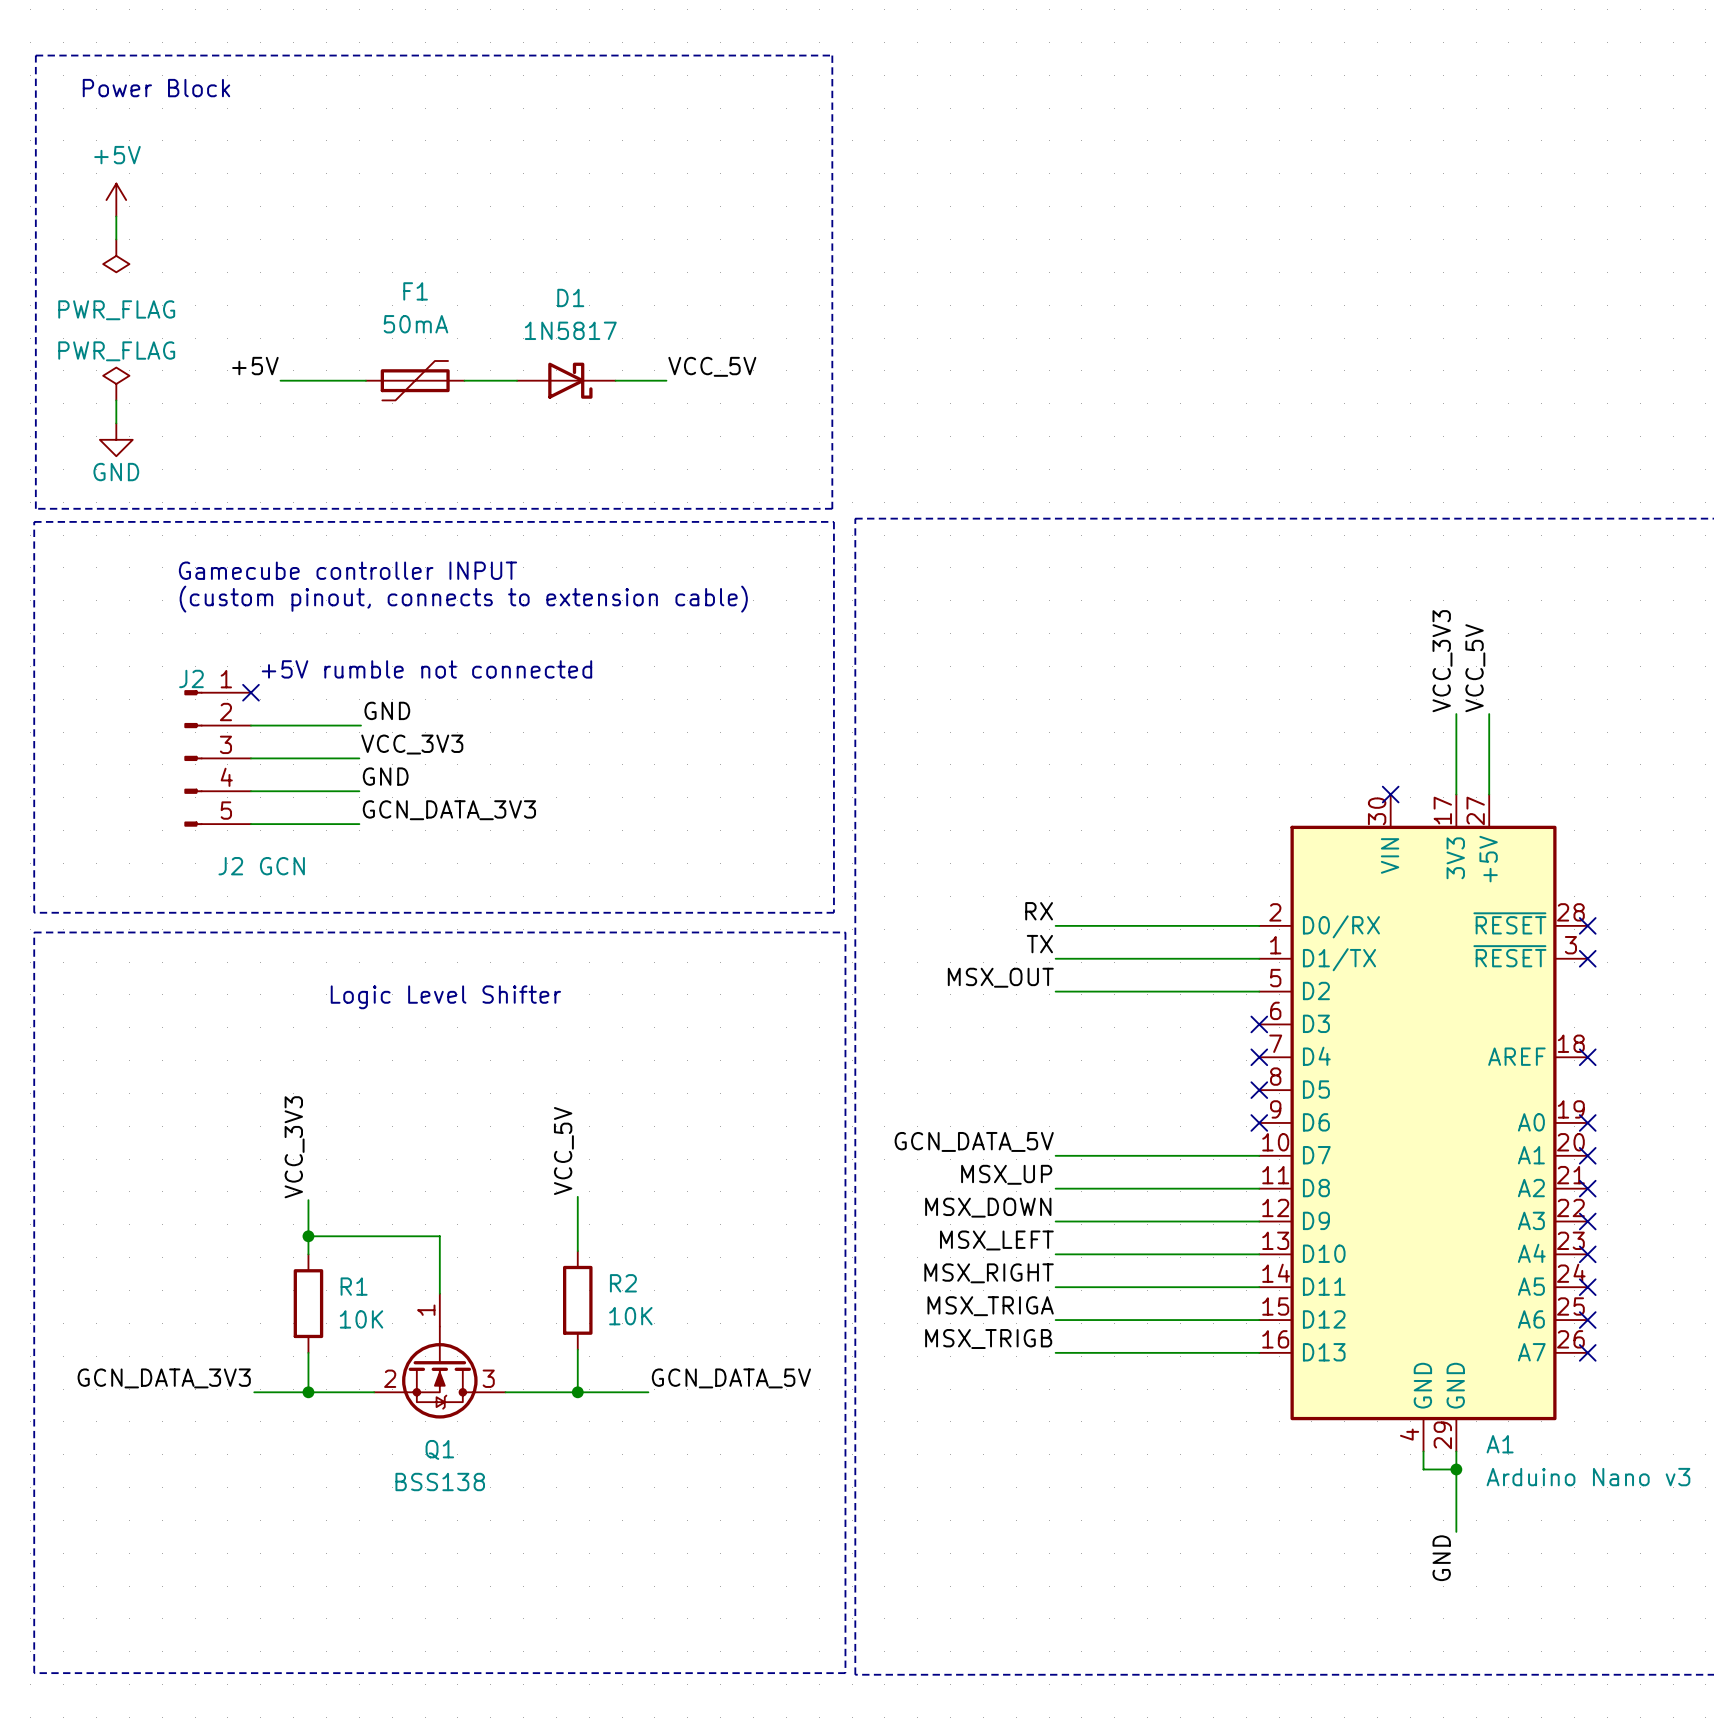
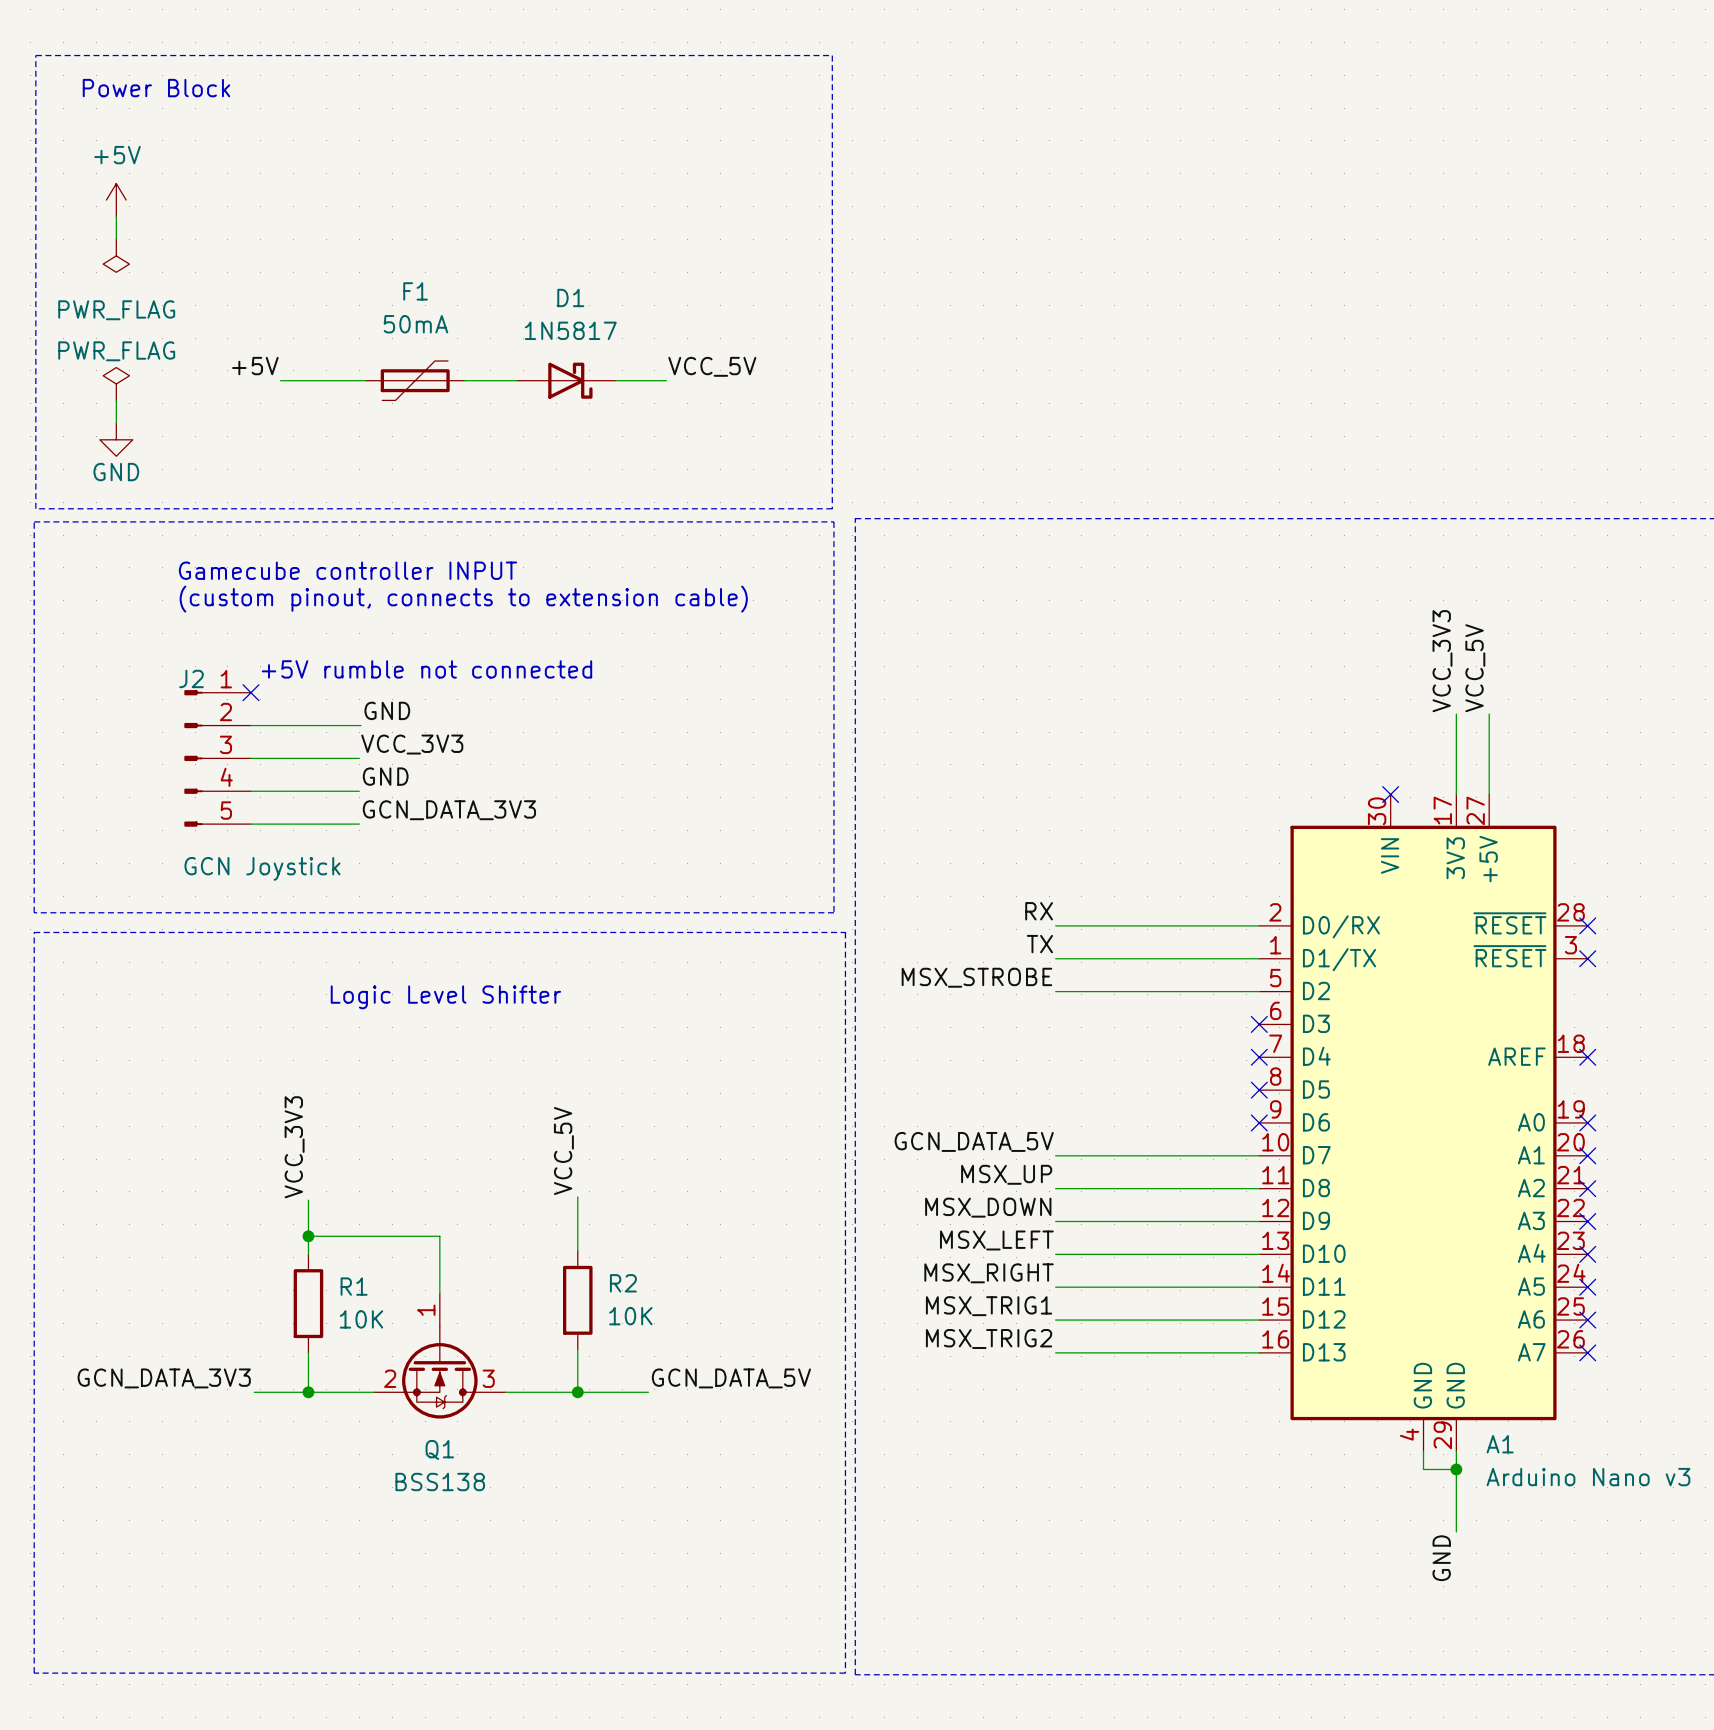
J2 value: J2 GCN (261, 866) -> GCN Joystick (262, 868)
label: MSX_OUT (1000, 977) -> MSX_STROBE (976, 977)
label: MSX_TRIGA (990, 1306) -> MSX_TRIG1 (989, 1306)
label: MSX_TRIGB (988, 1339) -> MSX_TRIG2 (989, 1339)

